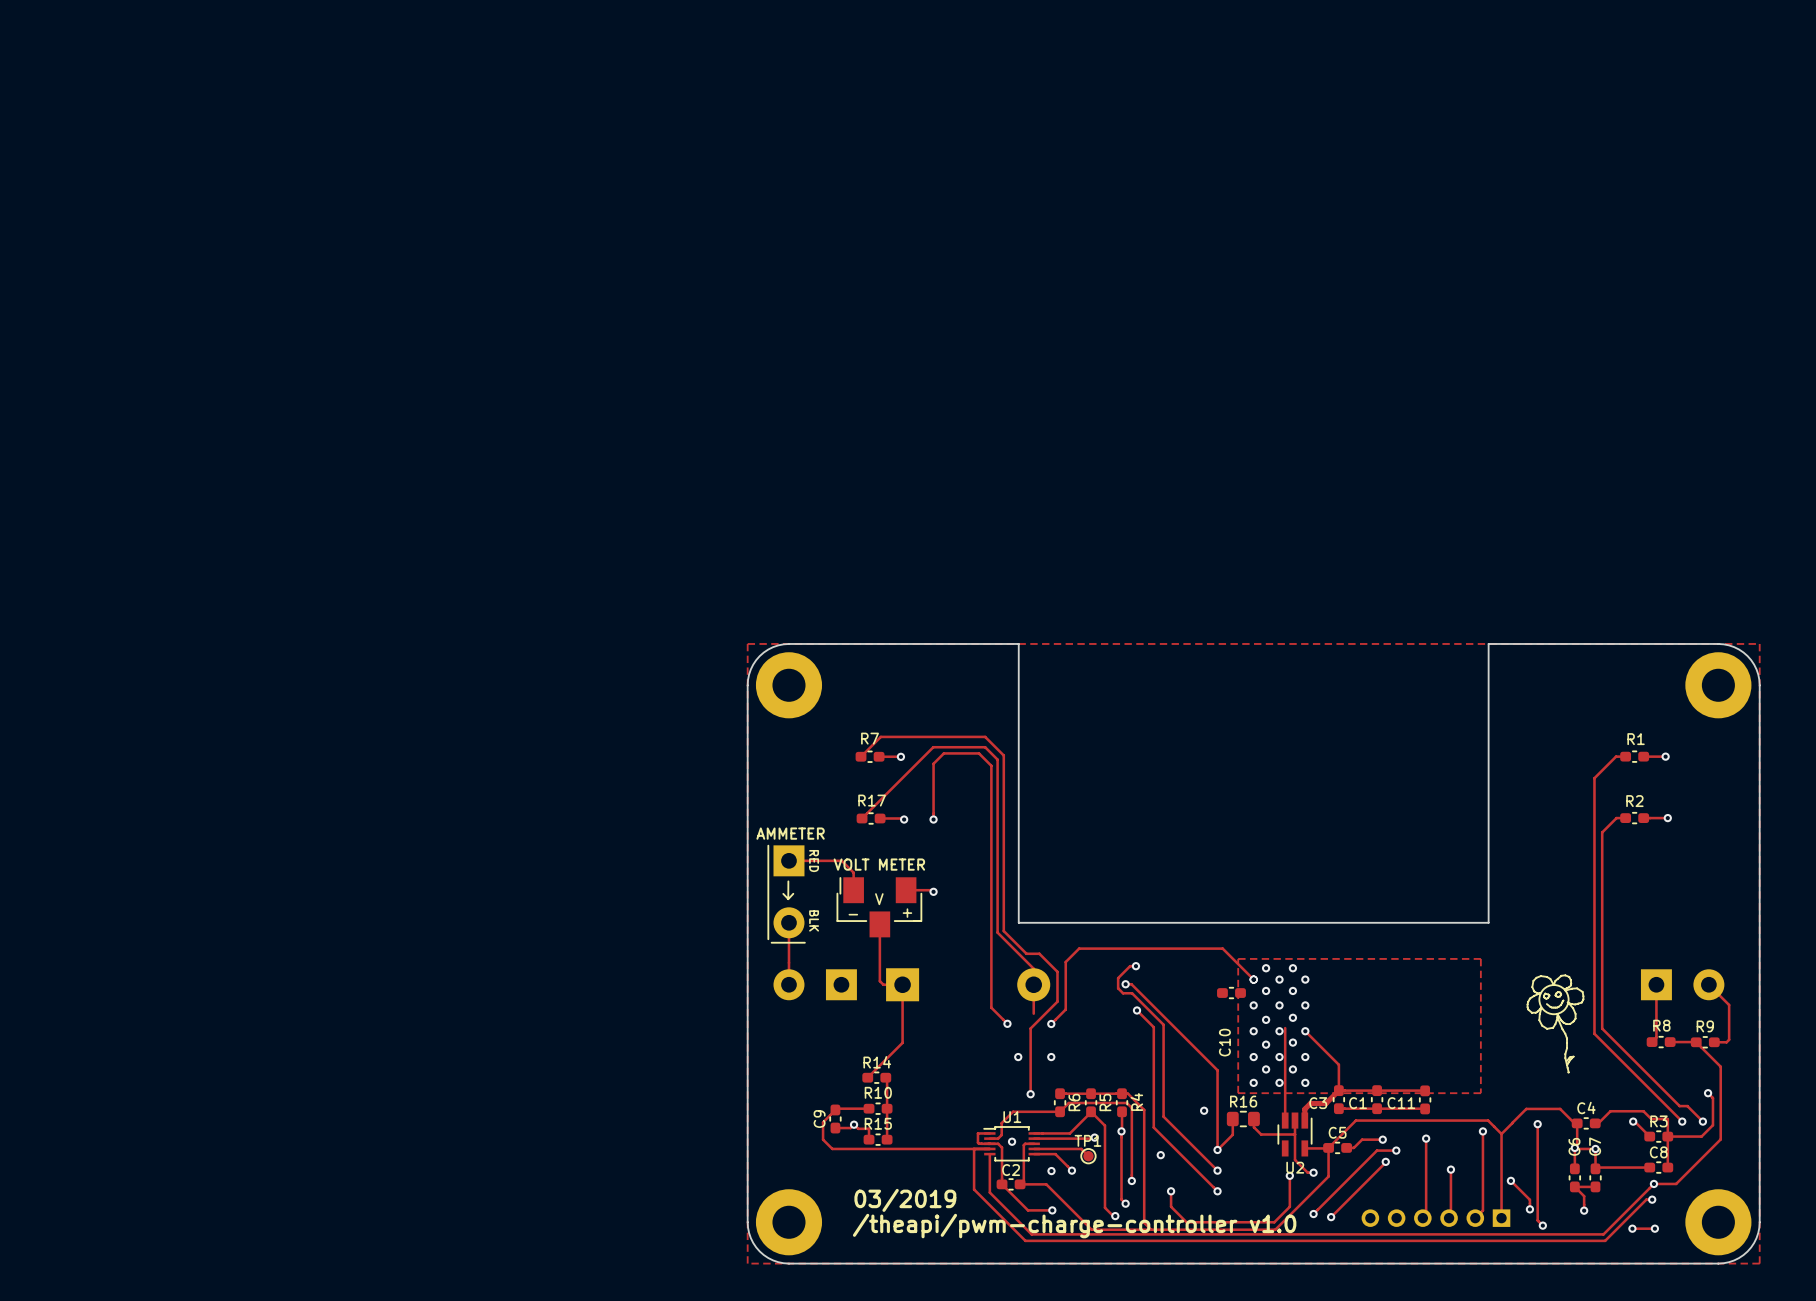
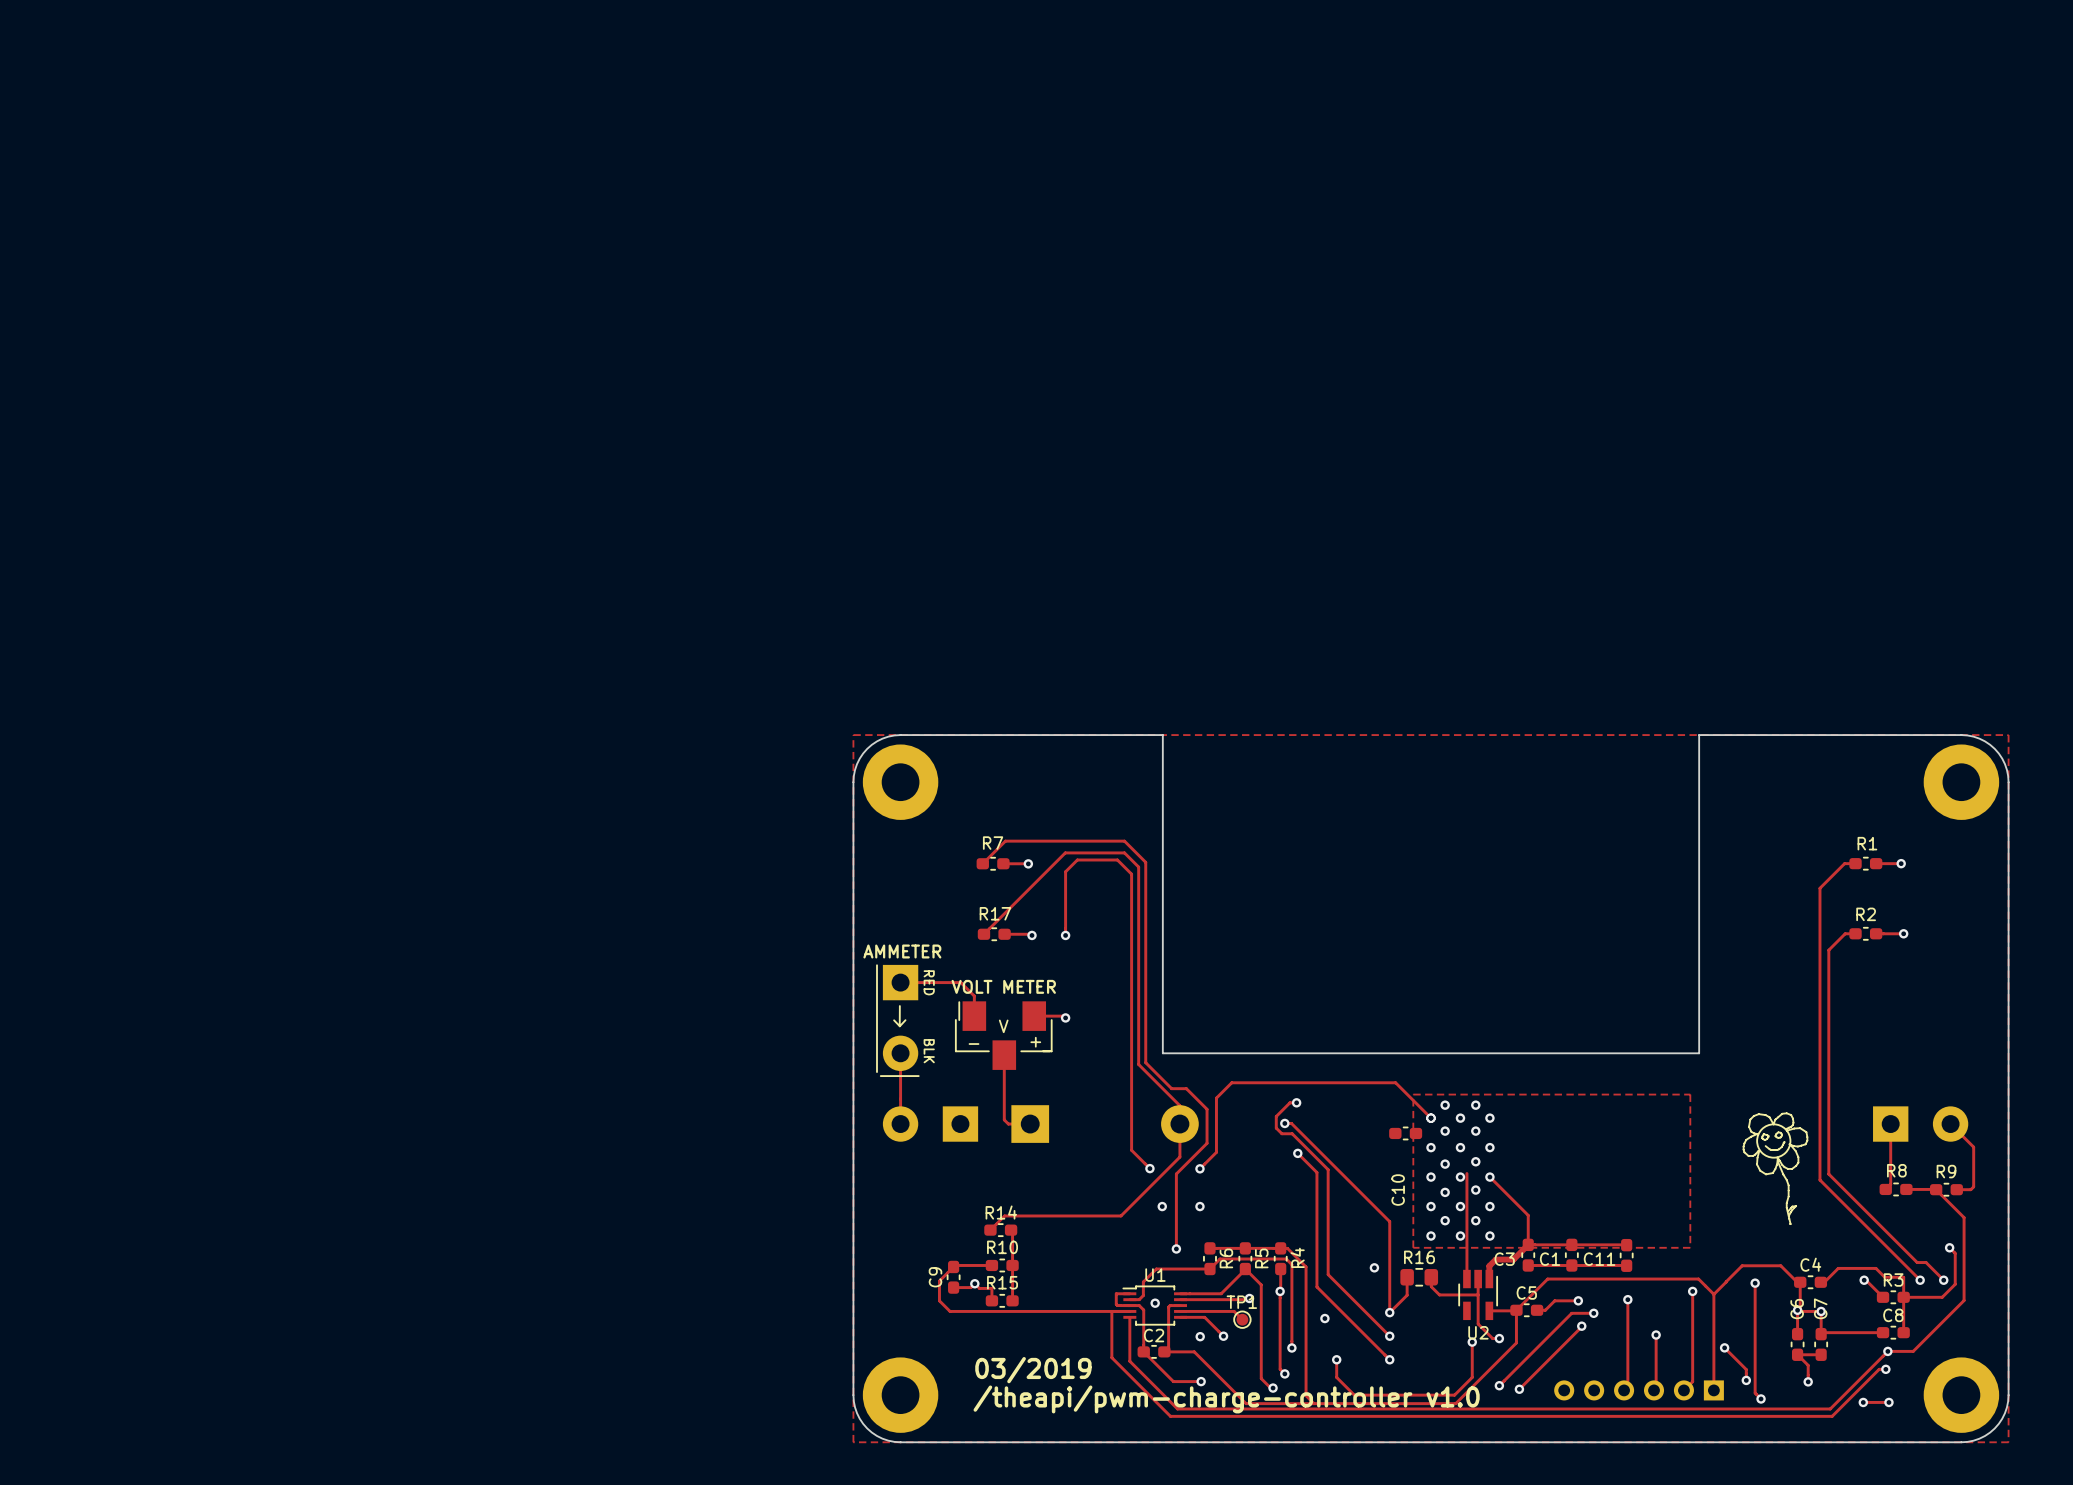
track: (902, 984) (902, 1042) (880, 1065) -> (1179, 1157) (1120, 1215) (1004, 1215)

